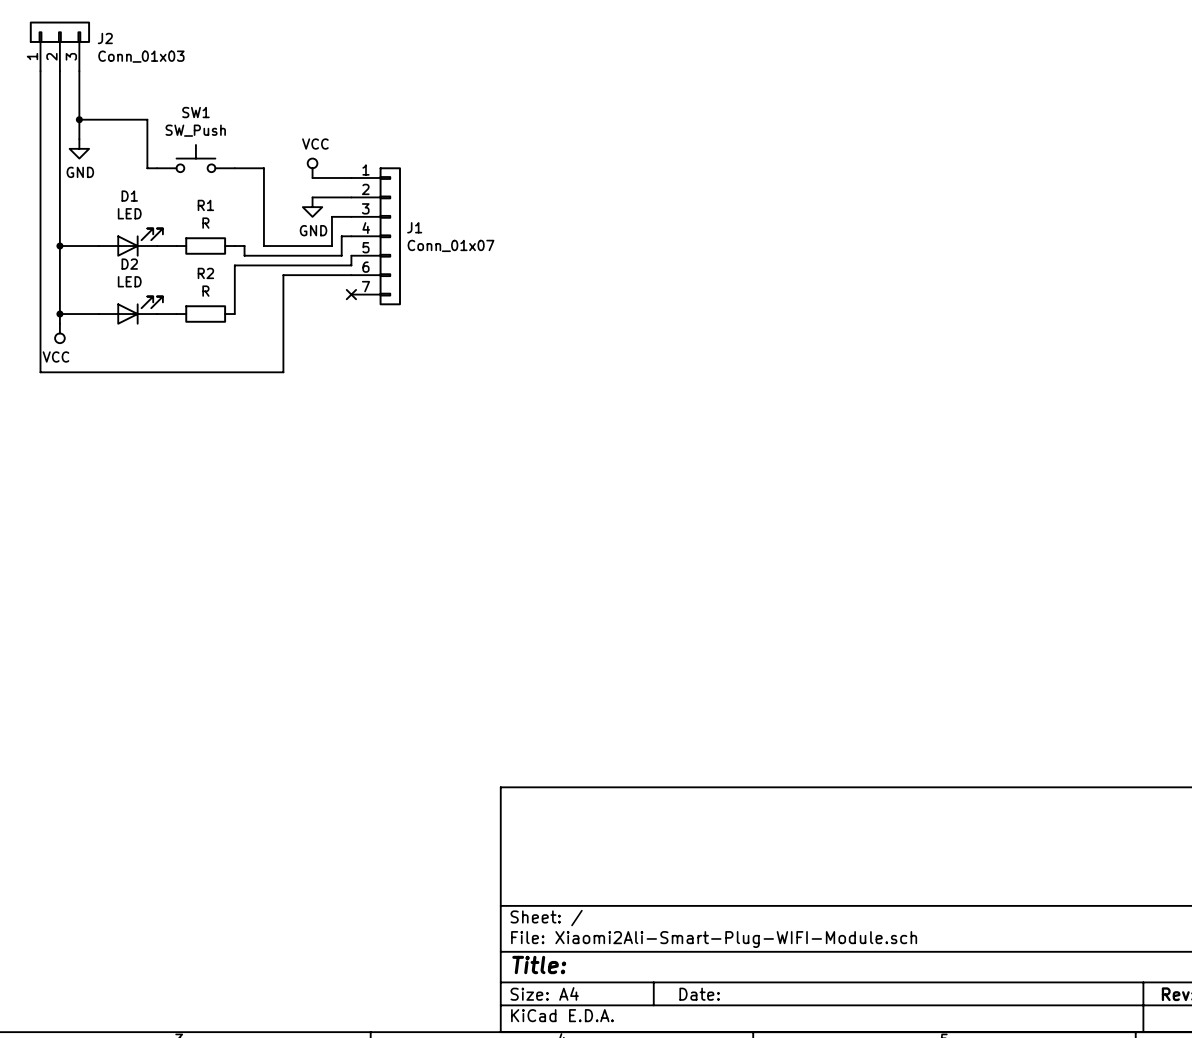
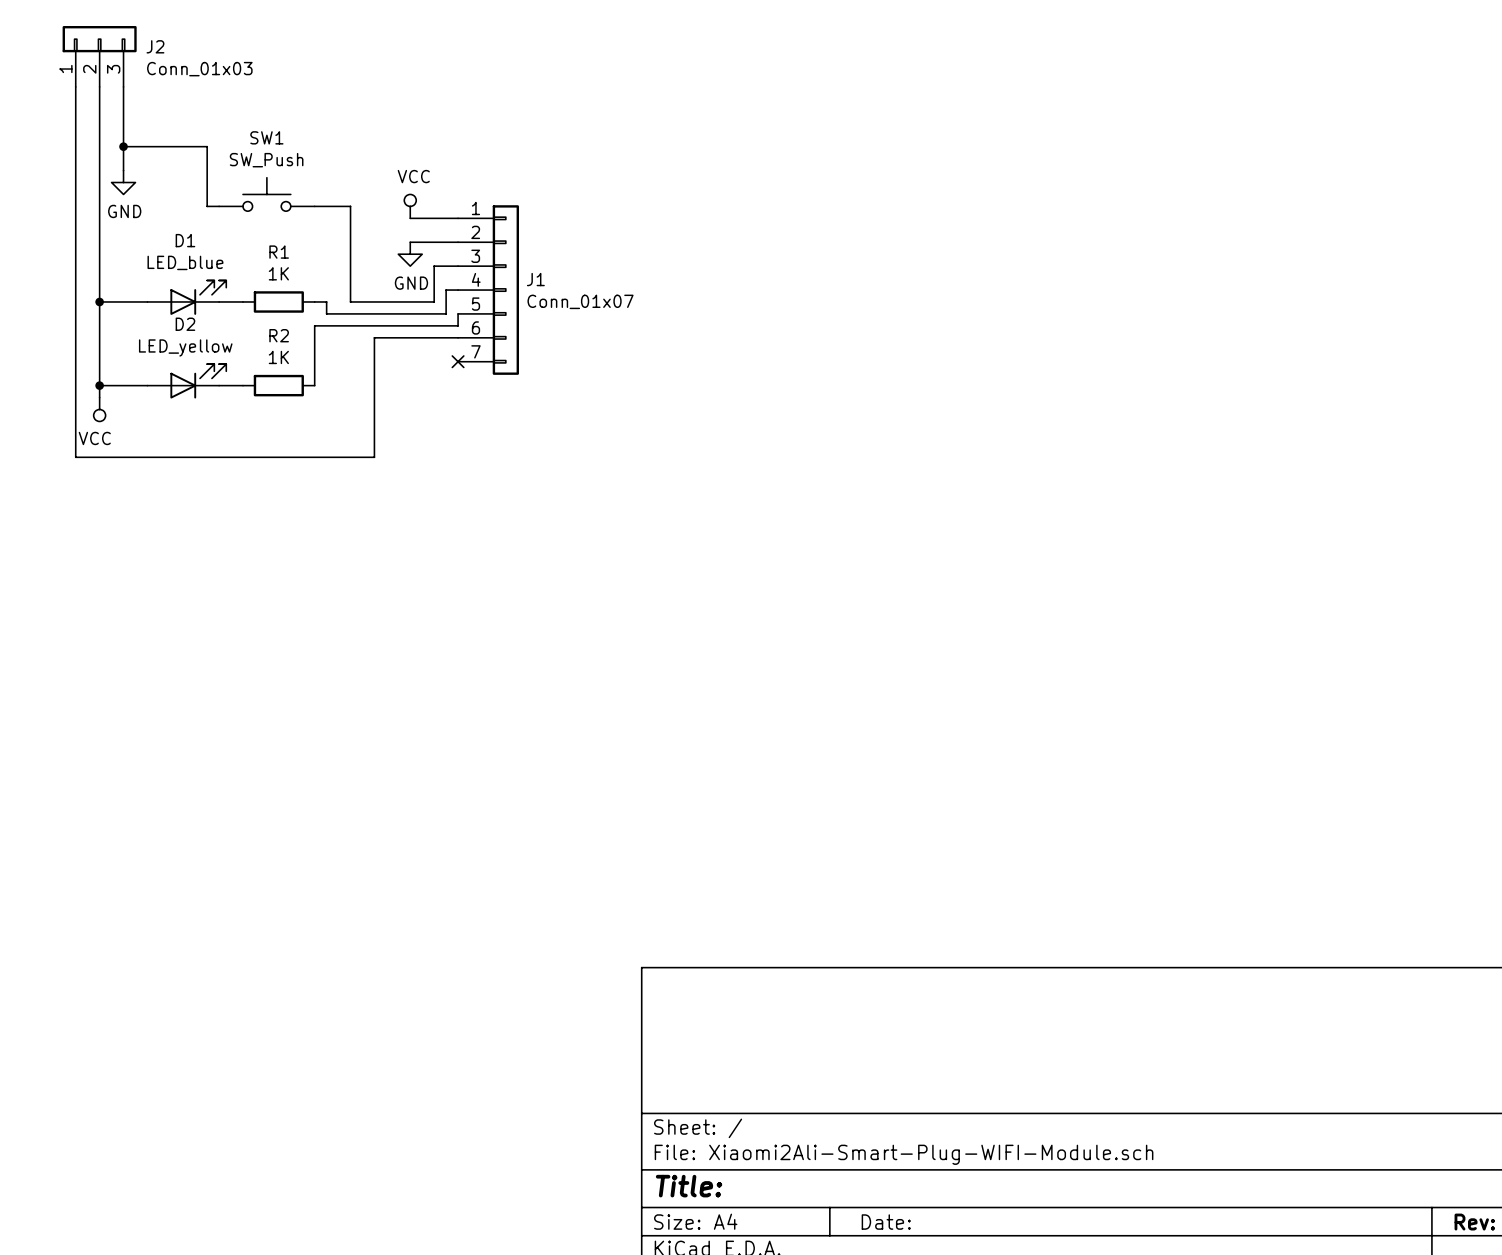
D1 value: LED (129, 213) -> LED_blue (185, 262)
R1 value: R (205, 223) -> 1K (278, 273)
D2 value: LED (129, 281) -> LED_yellow (185, 347)
R2 value: R (205, 291) -> 1K (278, 357)

